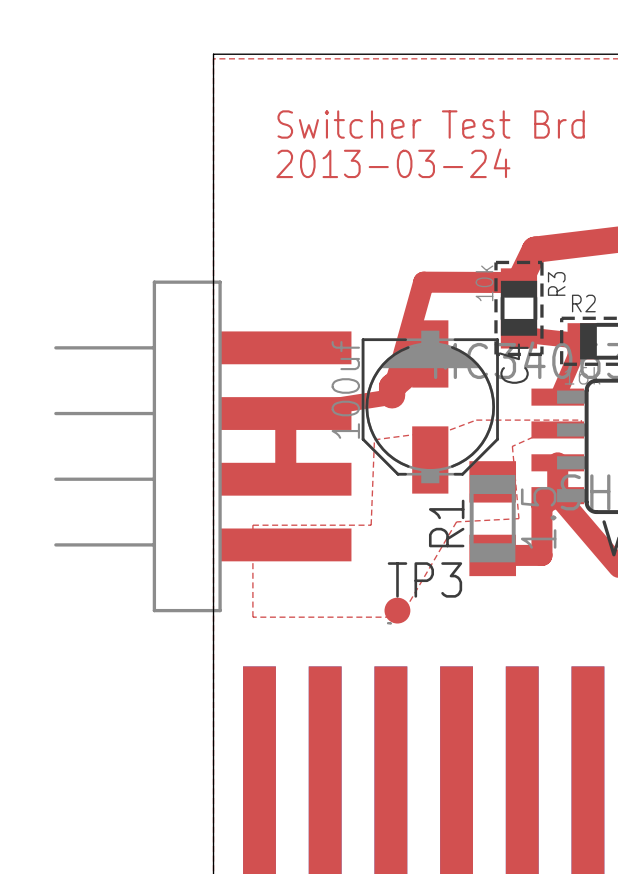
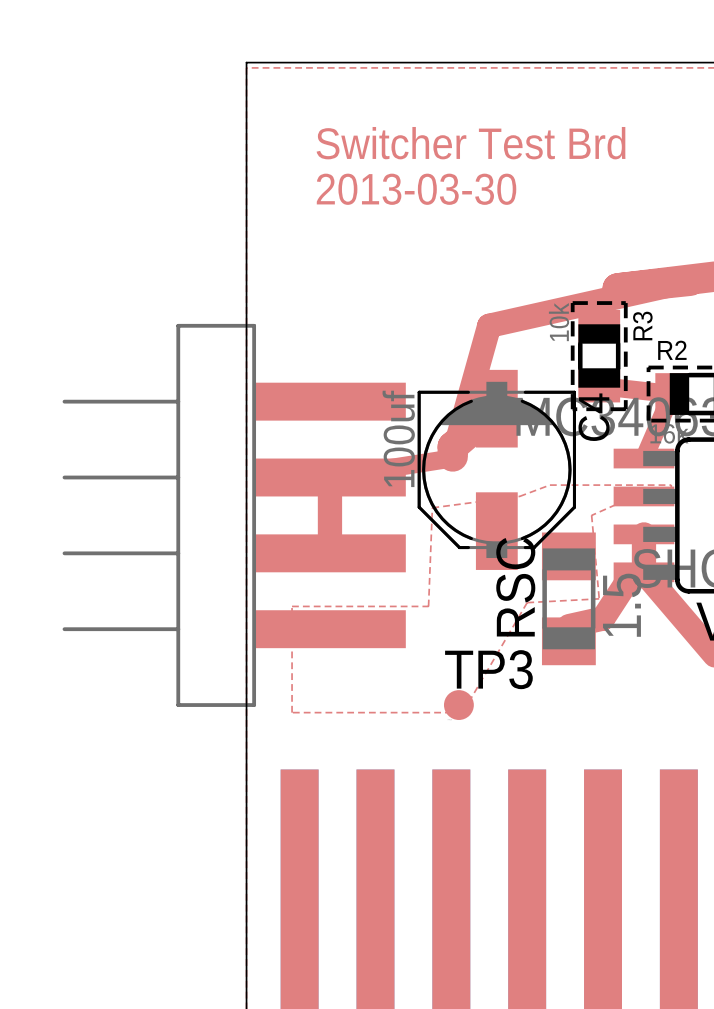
text: 2013-03-24 (393, 163) -> 2013-03-30 (416, 189)
top track: (534, 249) (518, 282) (423, 282) -> (617, 288) (690, 280) (489, 325)
top track: (541, 505) (541, 555) (492, 555) -> (625, 583) (603, 618) (568, 626)
R1 name: R1 (446, 523) -> RSC (515, 587)

